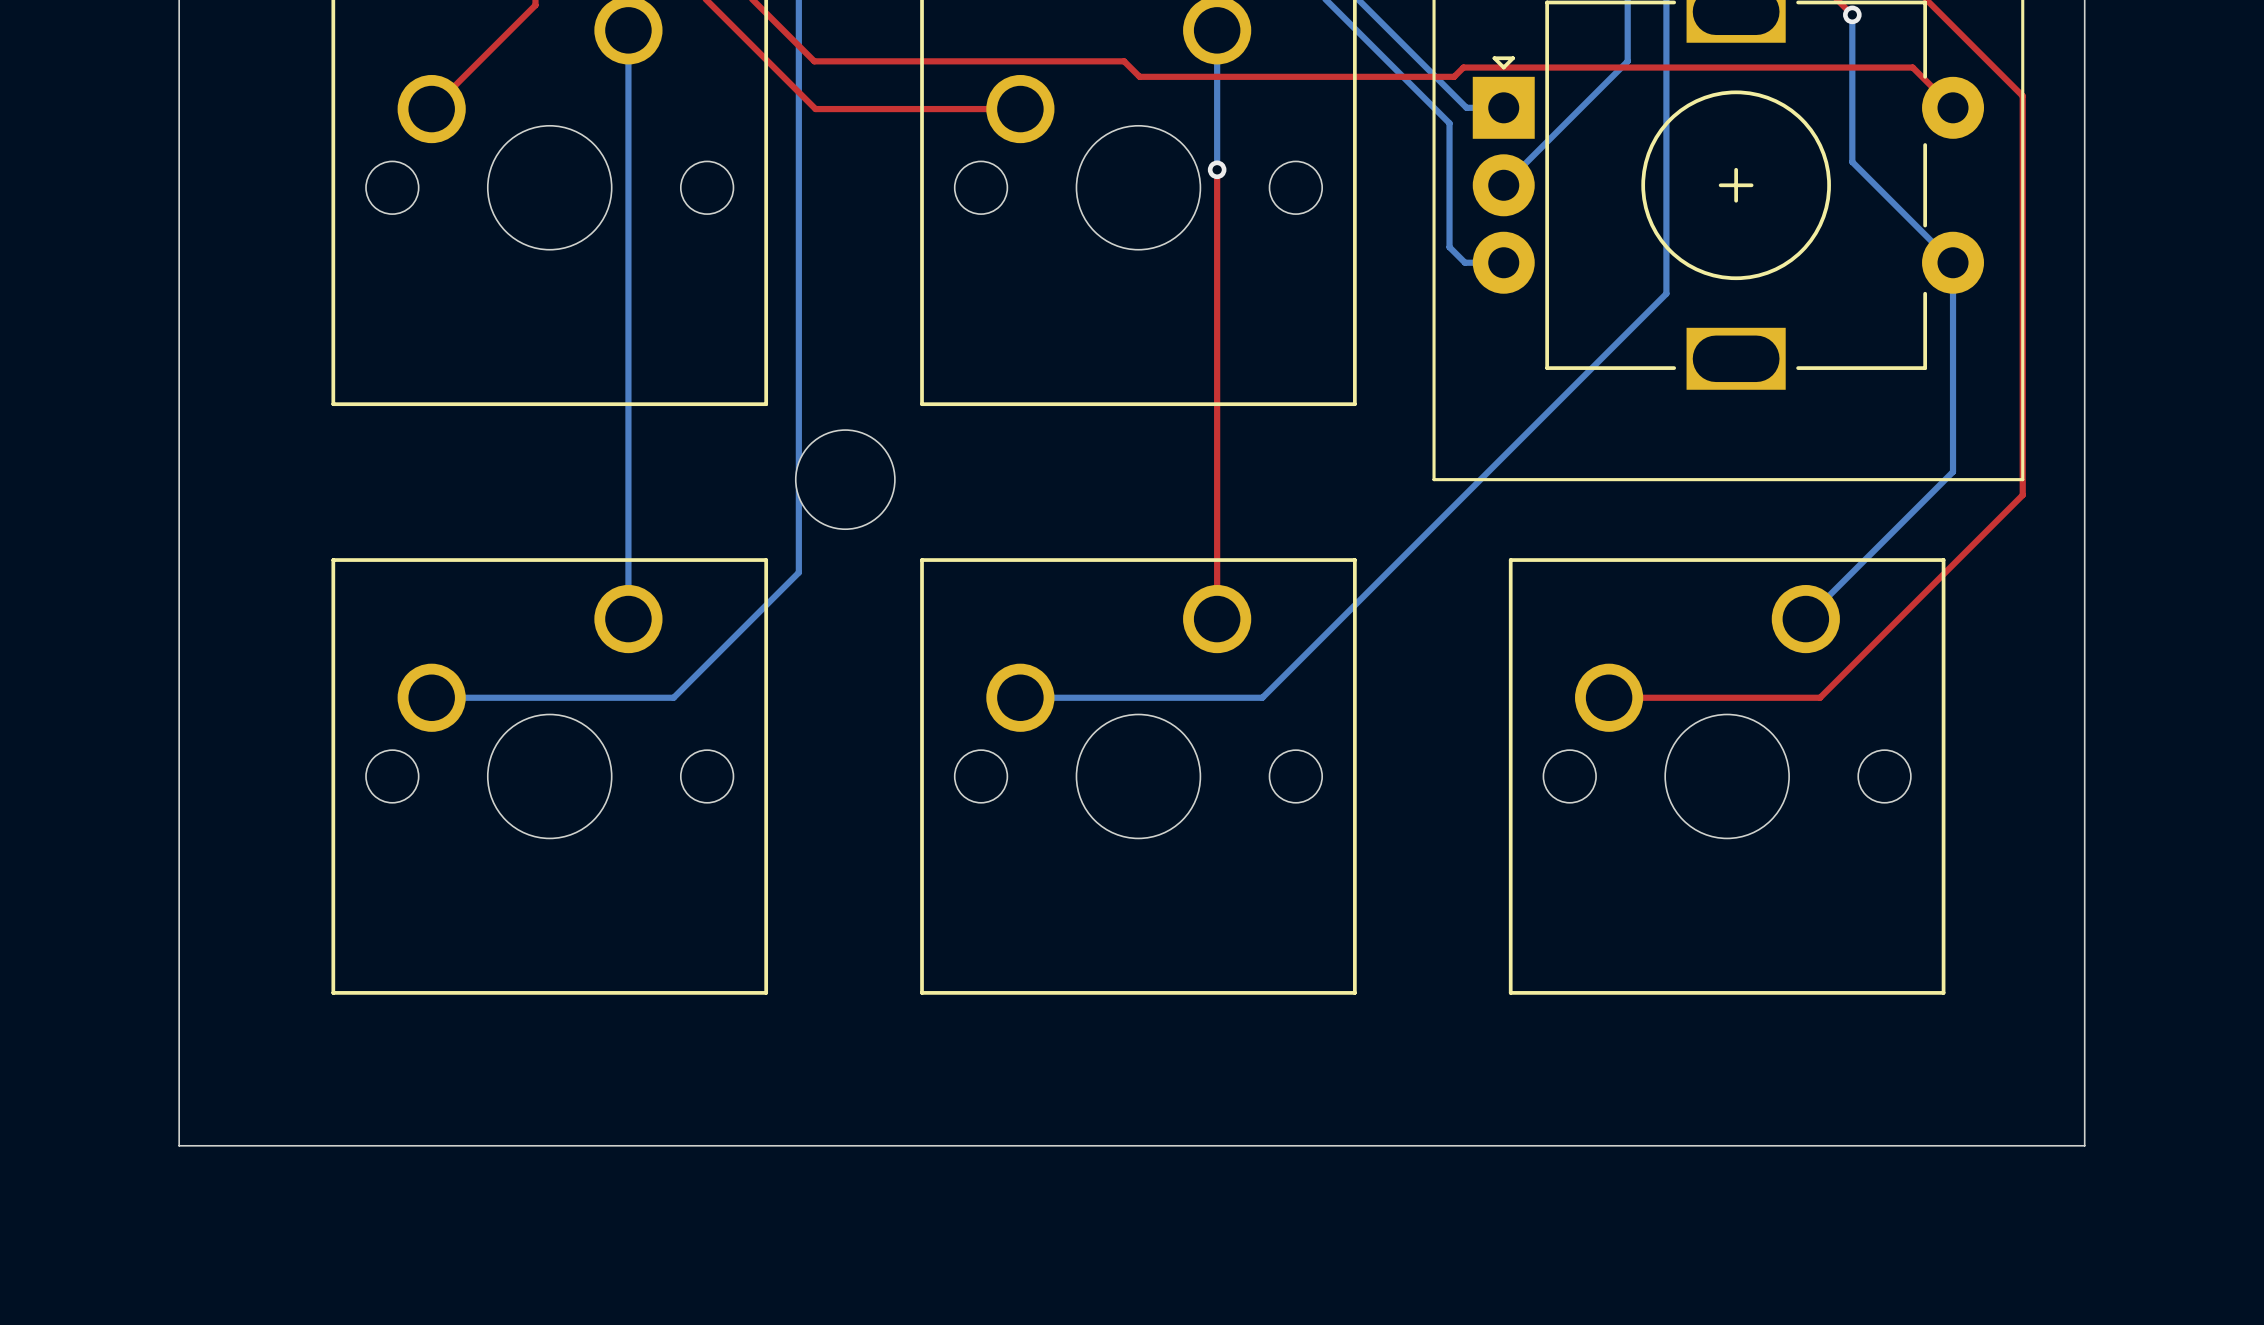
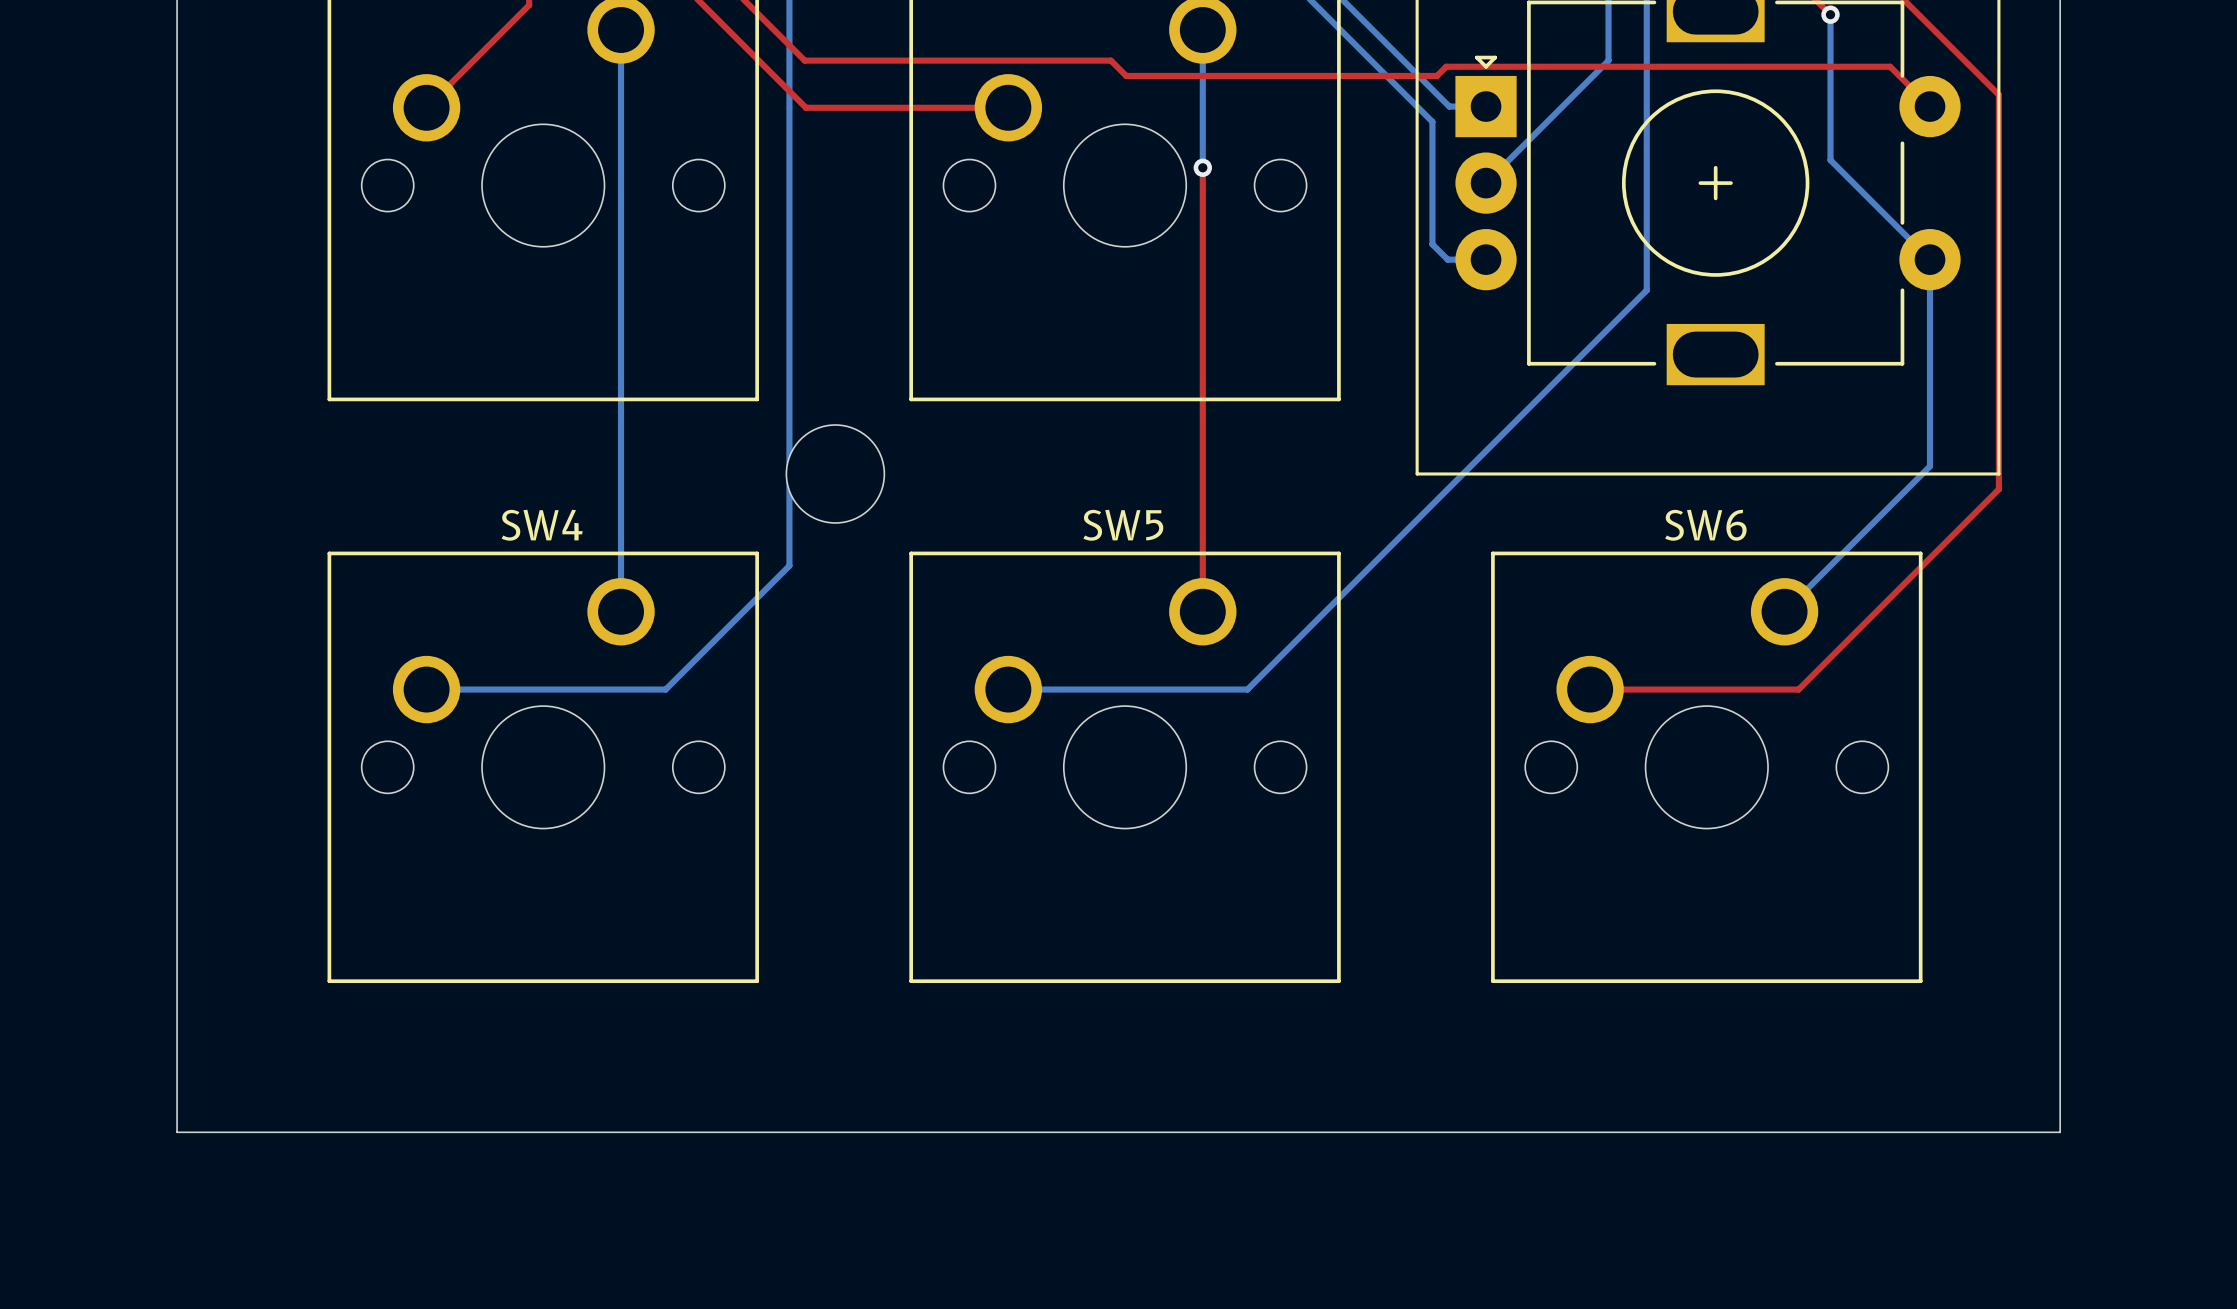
SW4 name: none -> SW4 (542, 525)
SW5 name: none -> SW5 (1123, 525)
SW6 name: none -> SW6 (1705, 525)

